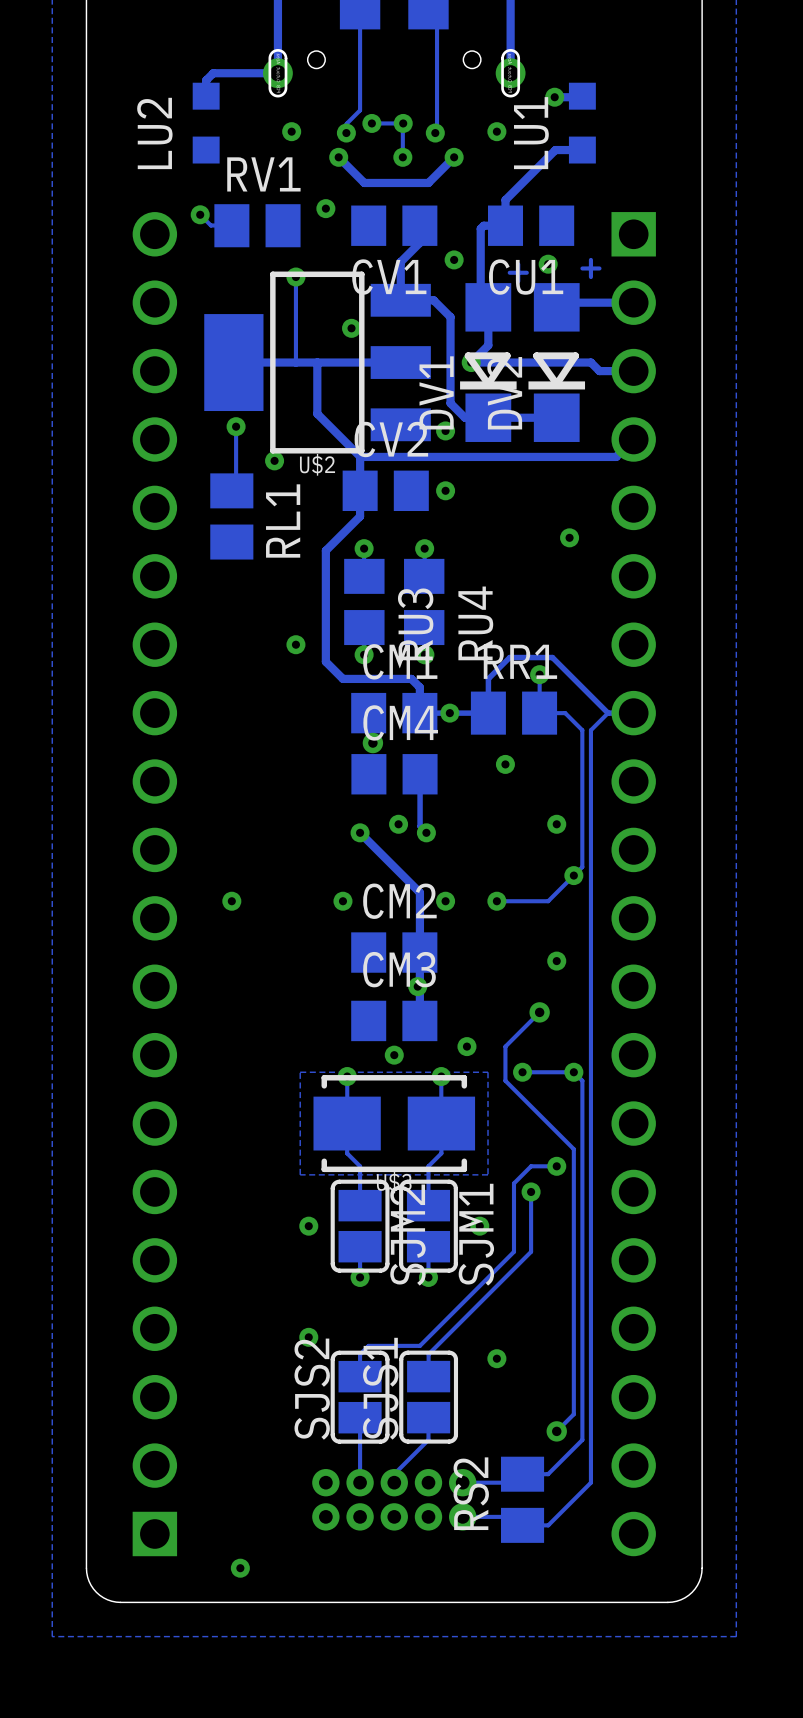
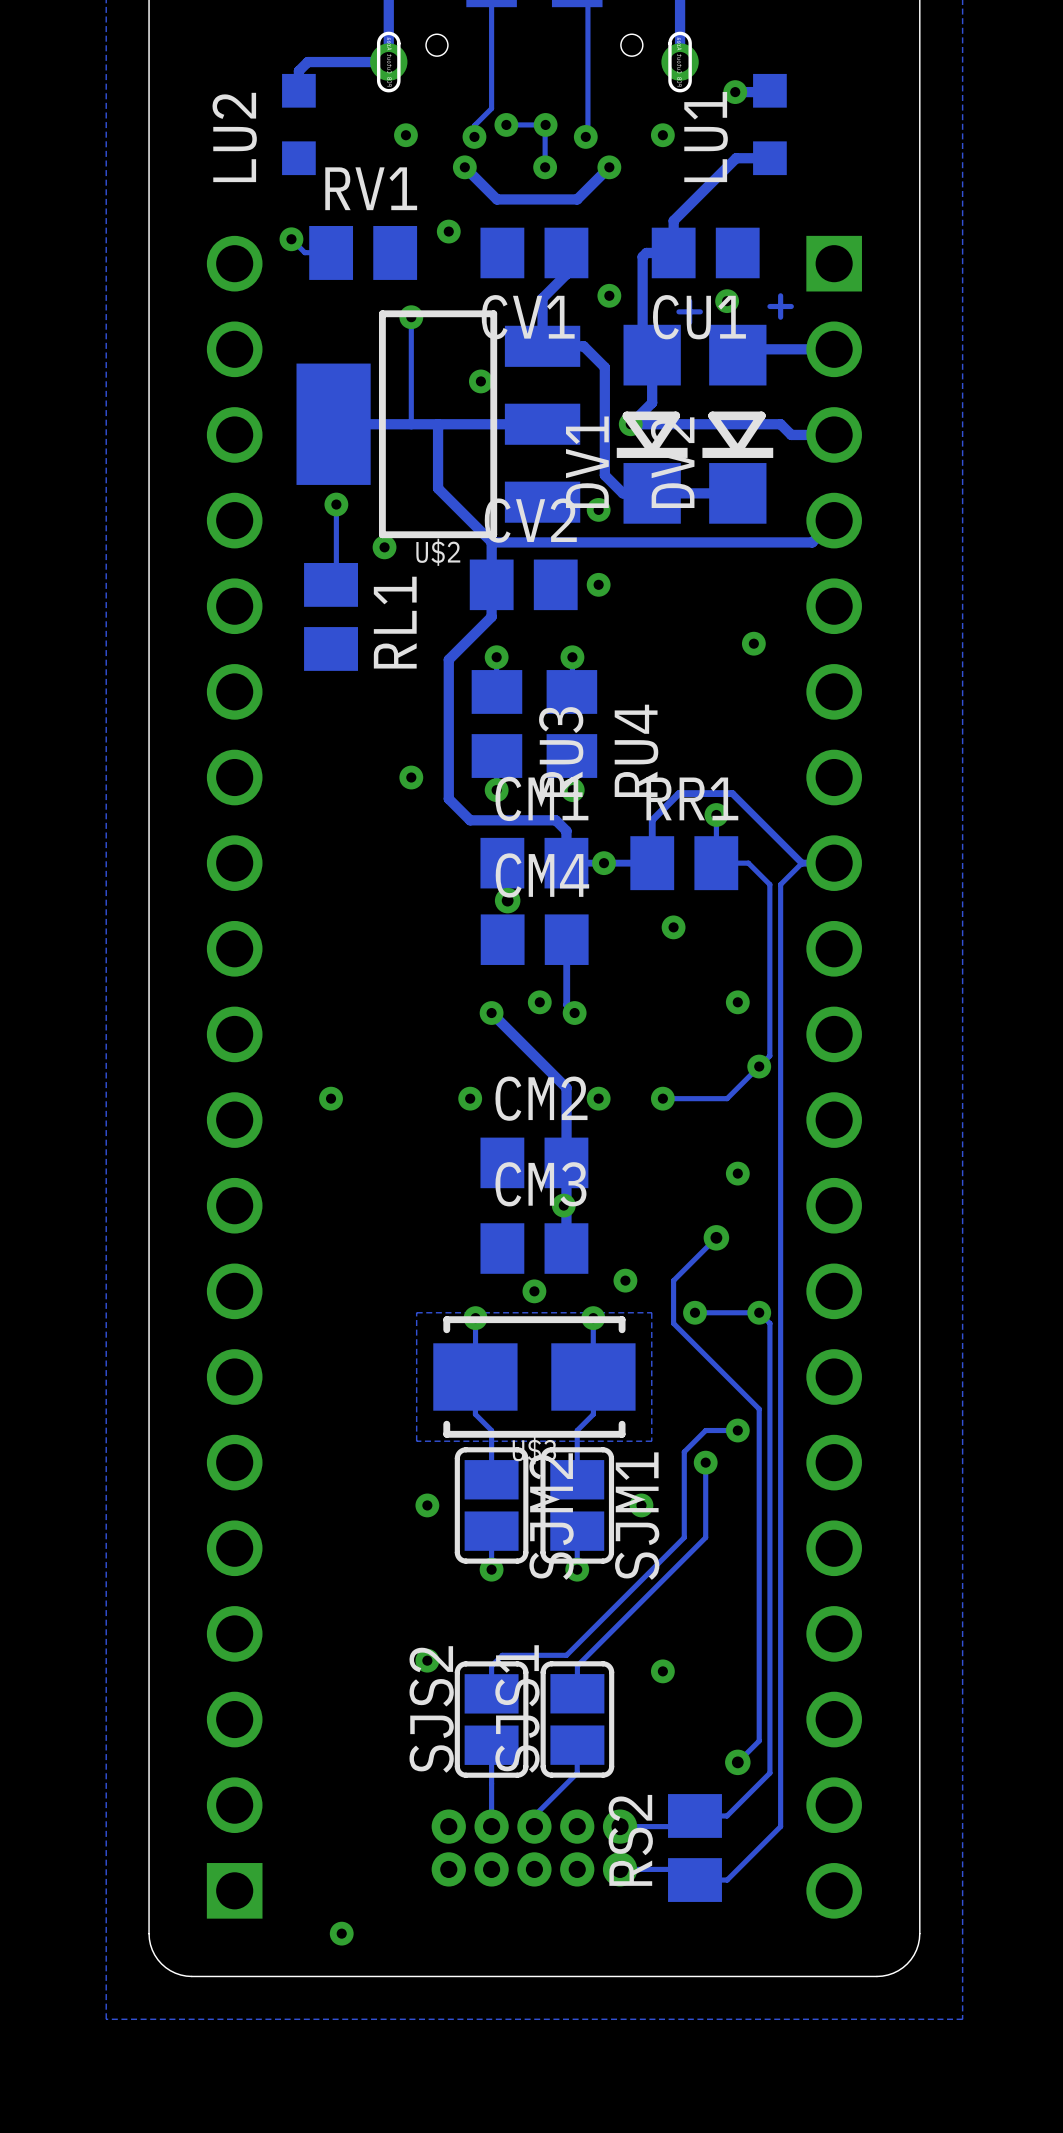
via position: (308, 1337) -> (427, 1660)

